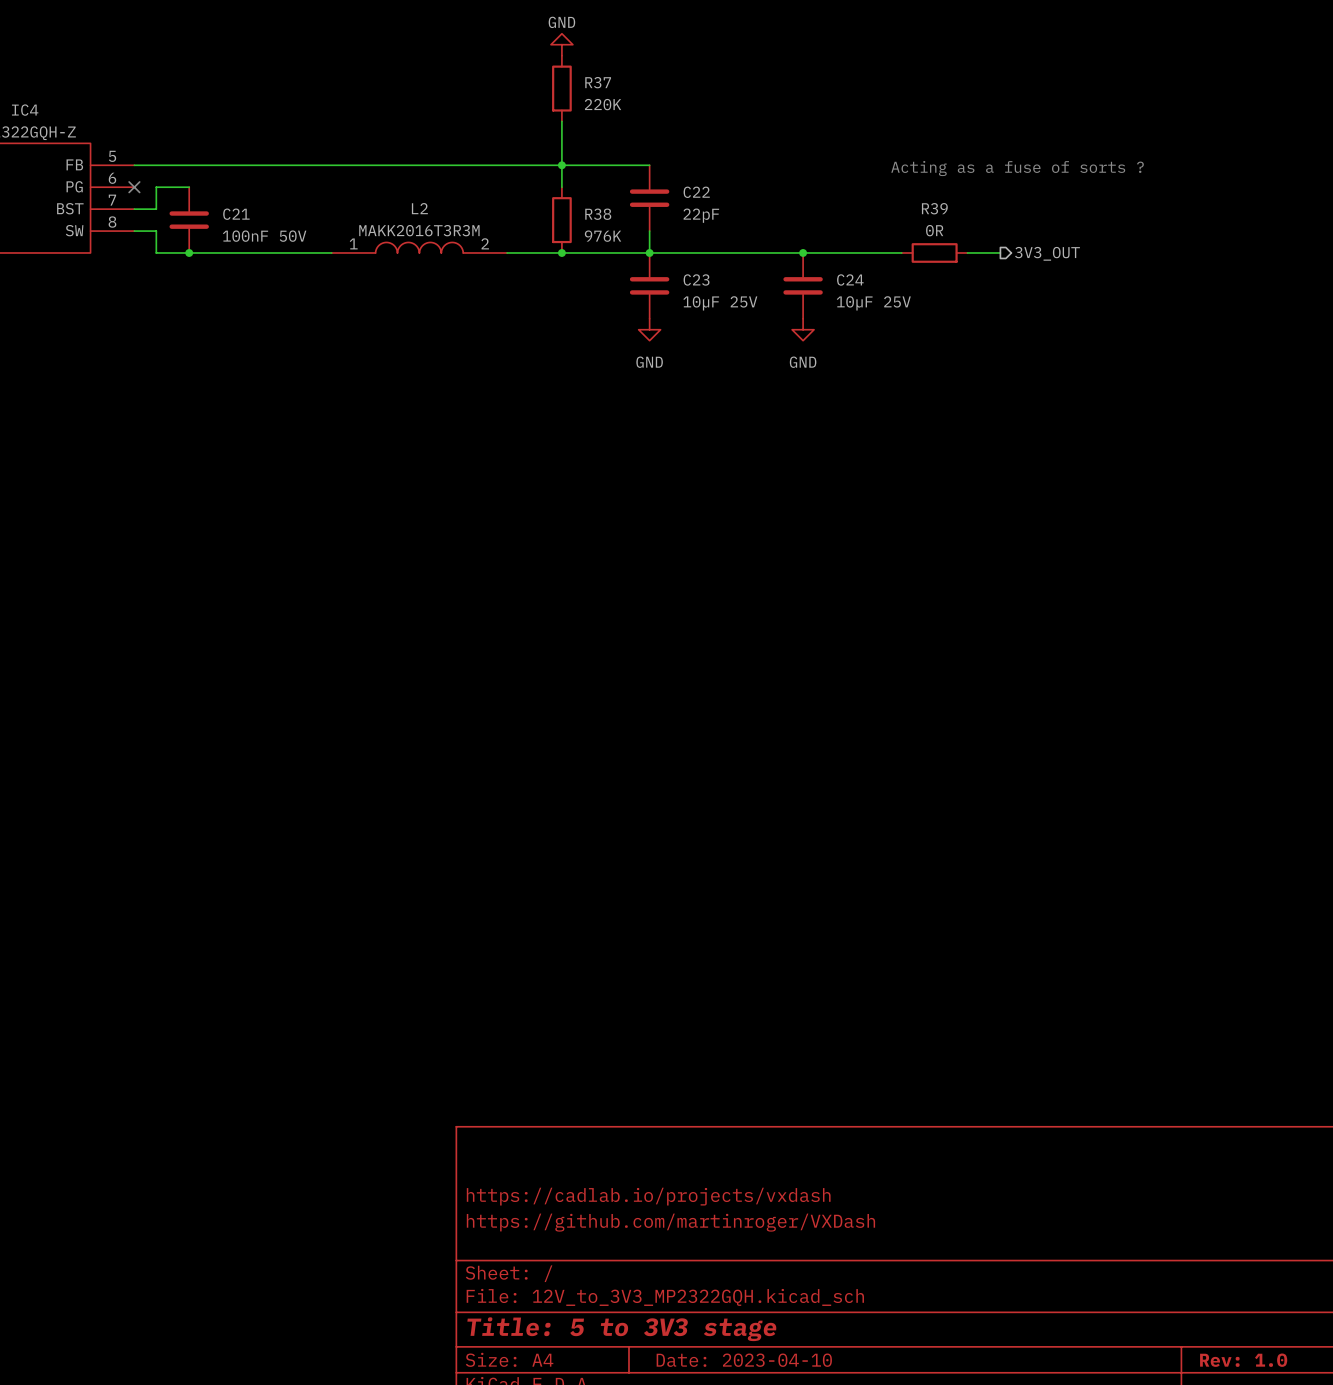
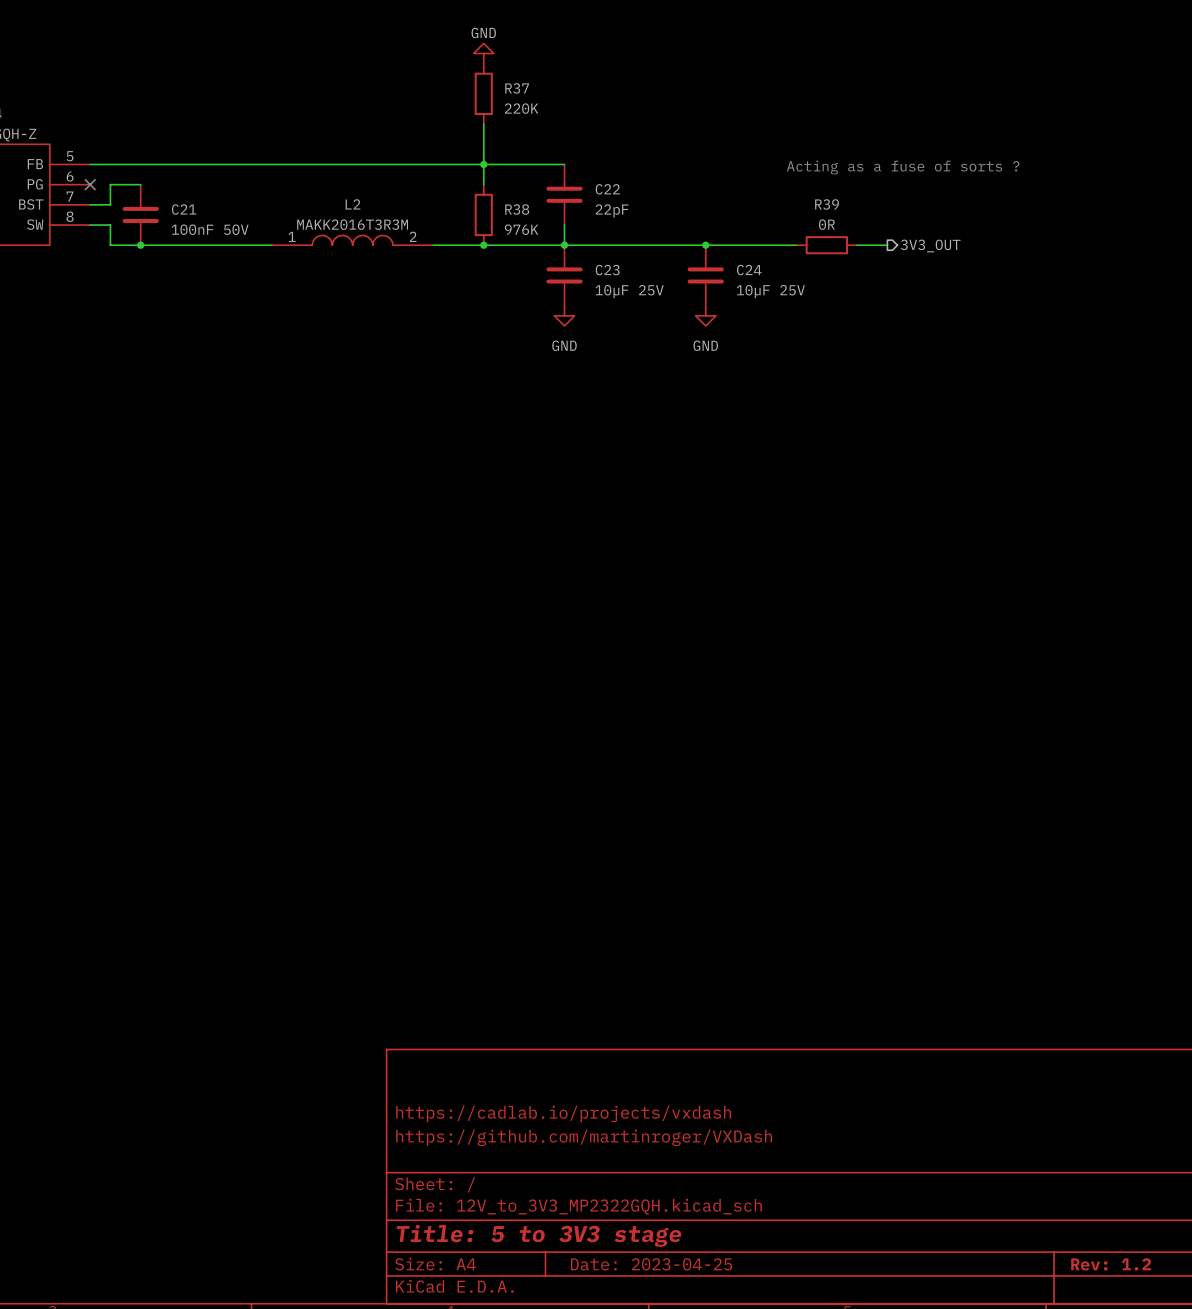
title block: Date: 2023-04-10 (744, 1360) -> Date: 2023-04-25 (651, 1264)
title block: Rev: 1.0 (1243, 1360) -> Rev: 1.2 (1111, 1264)

